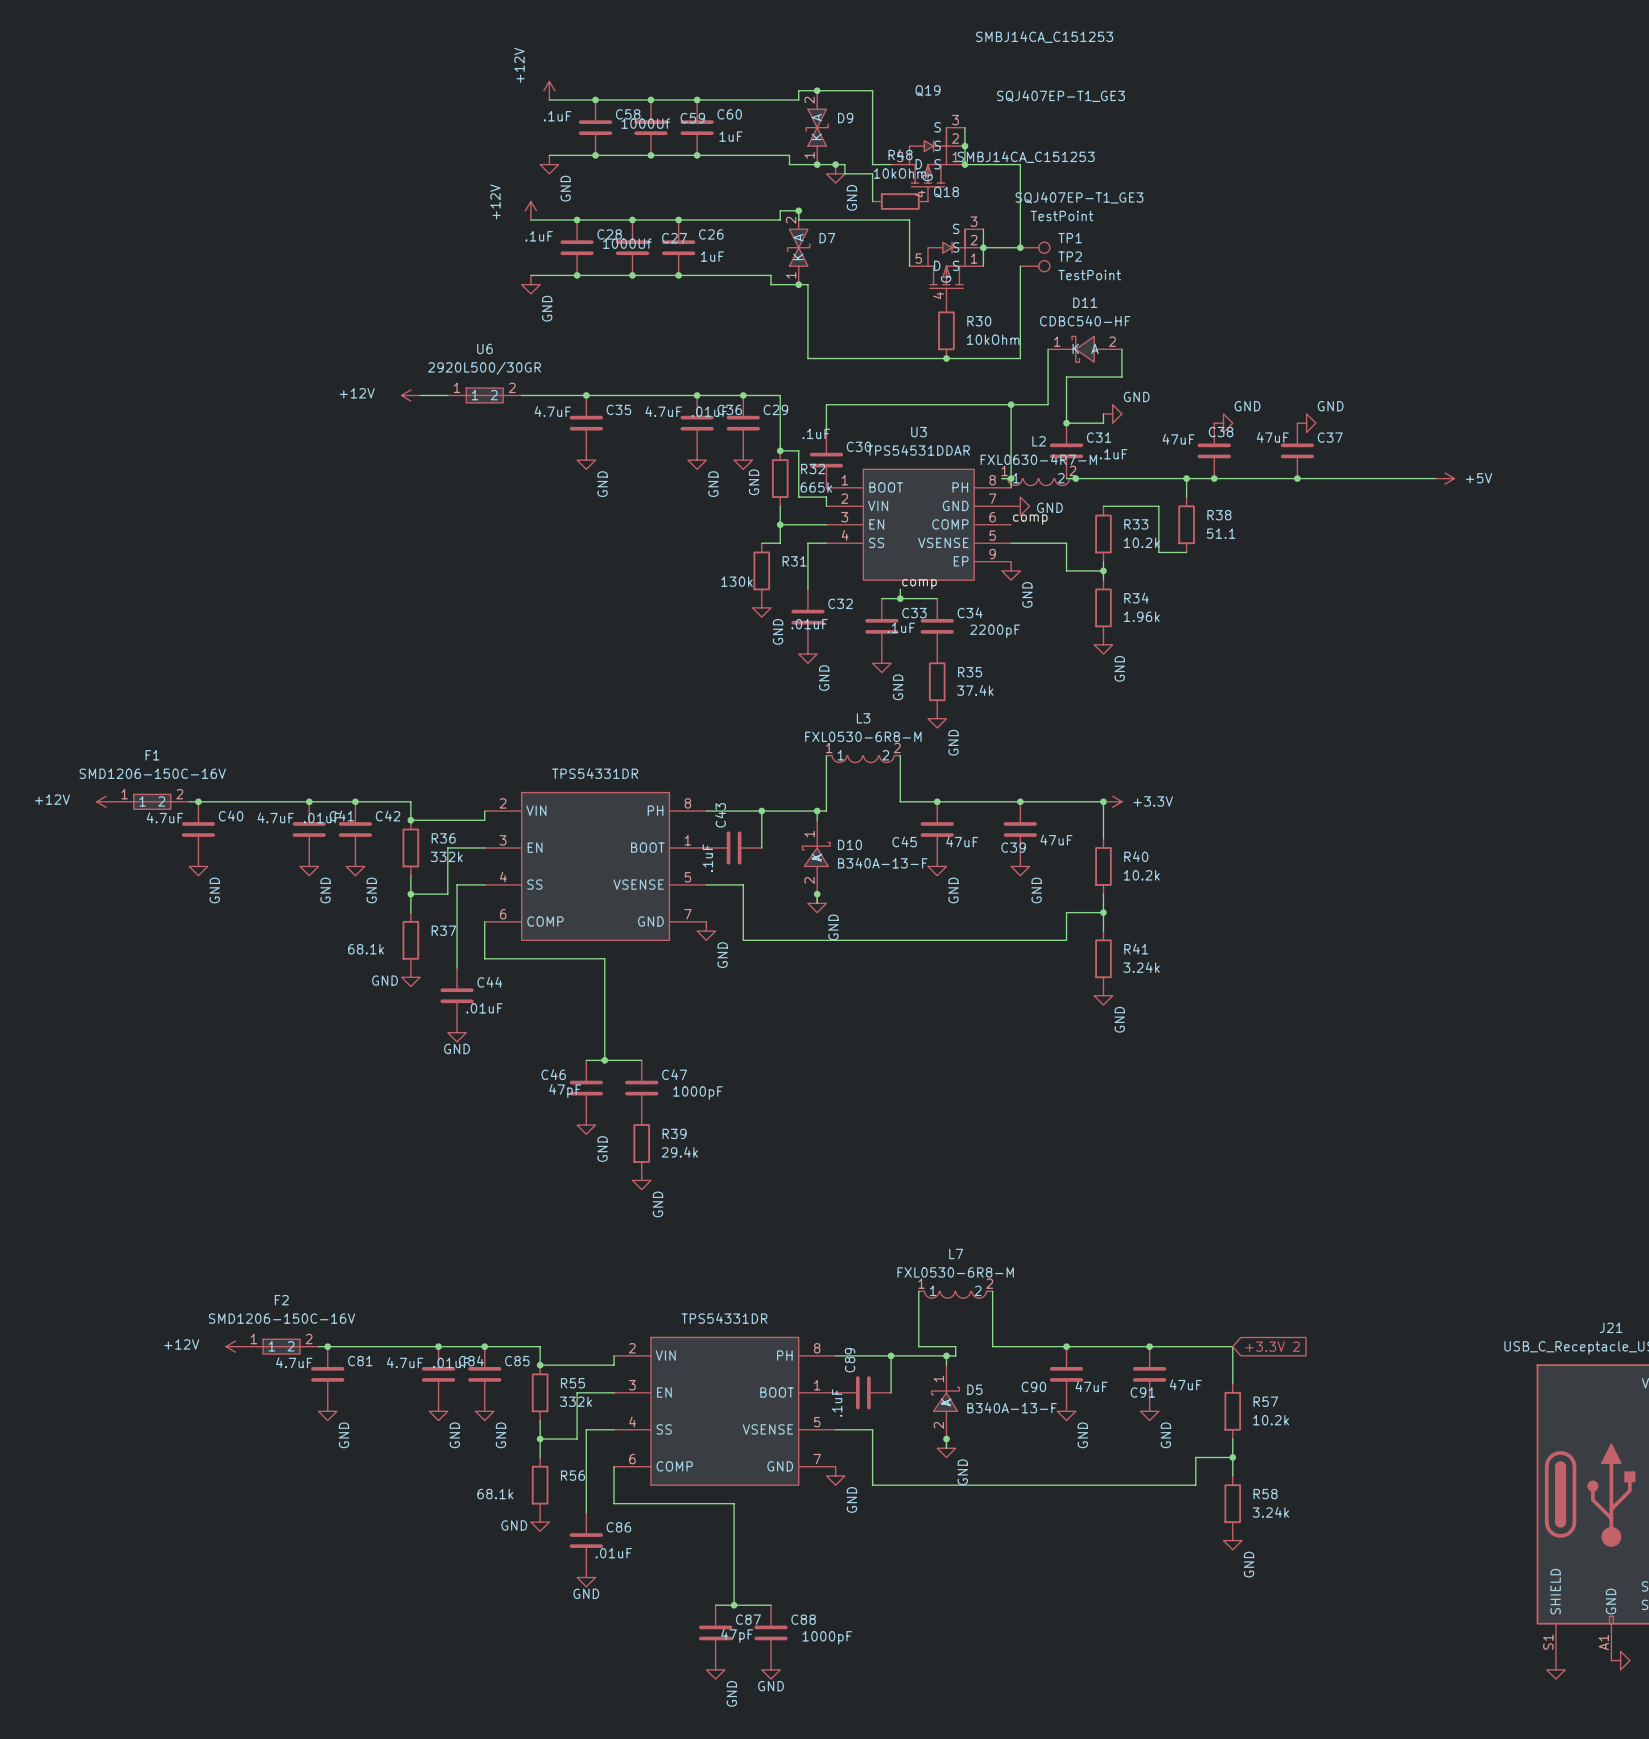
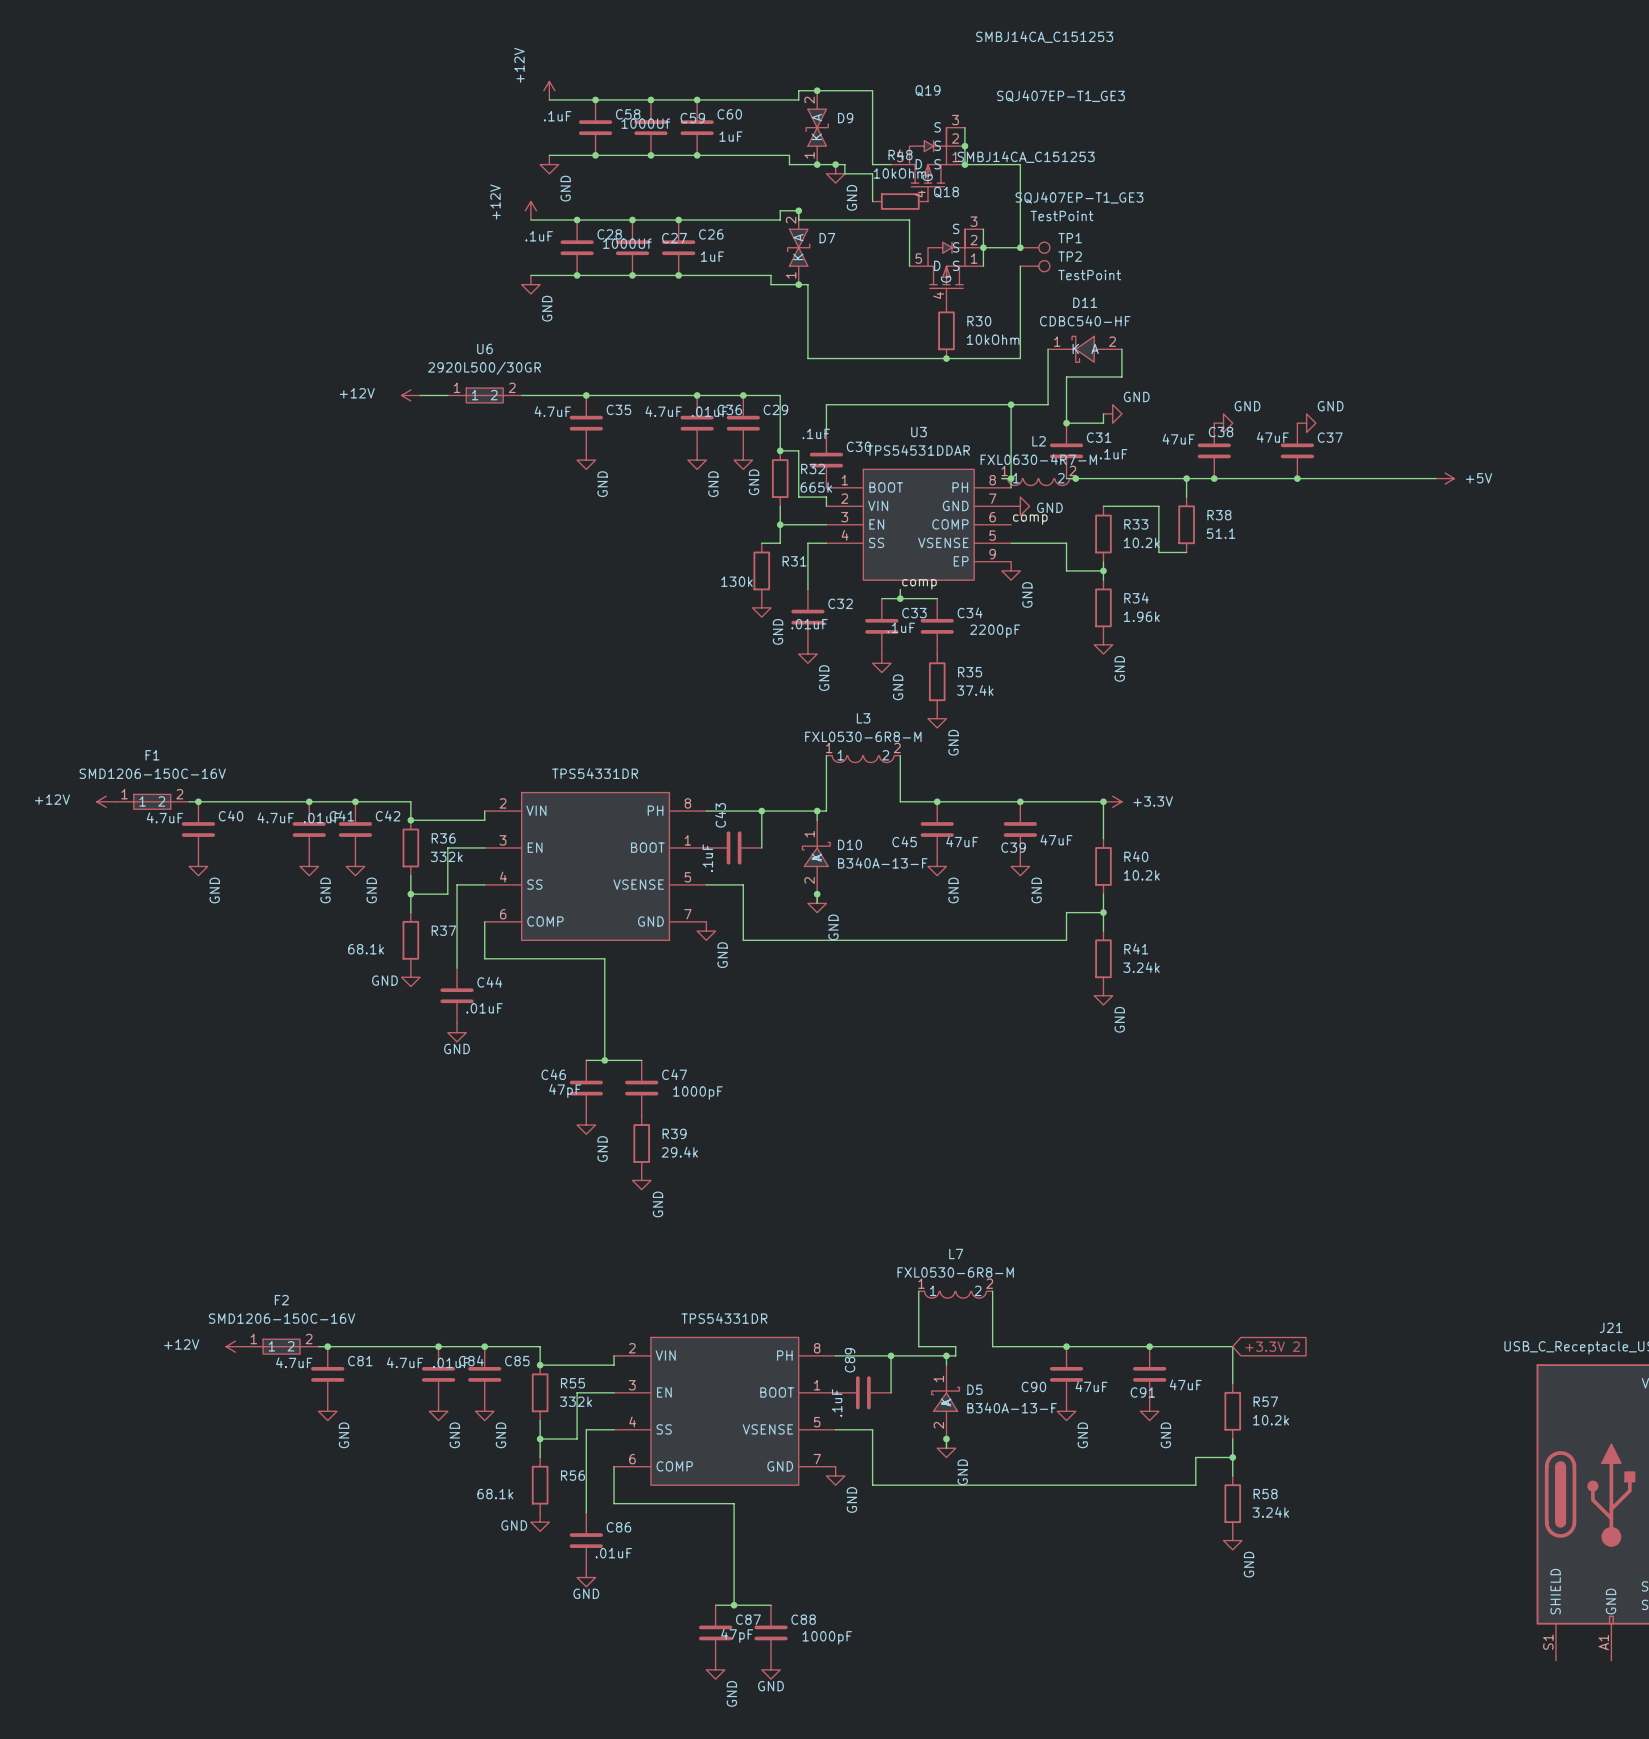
power symbol: (1620, 1660) -> none
power symbol: (1555, 1669) -> none

